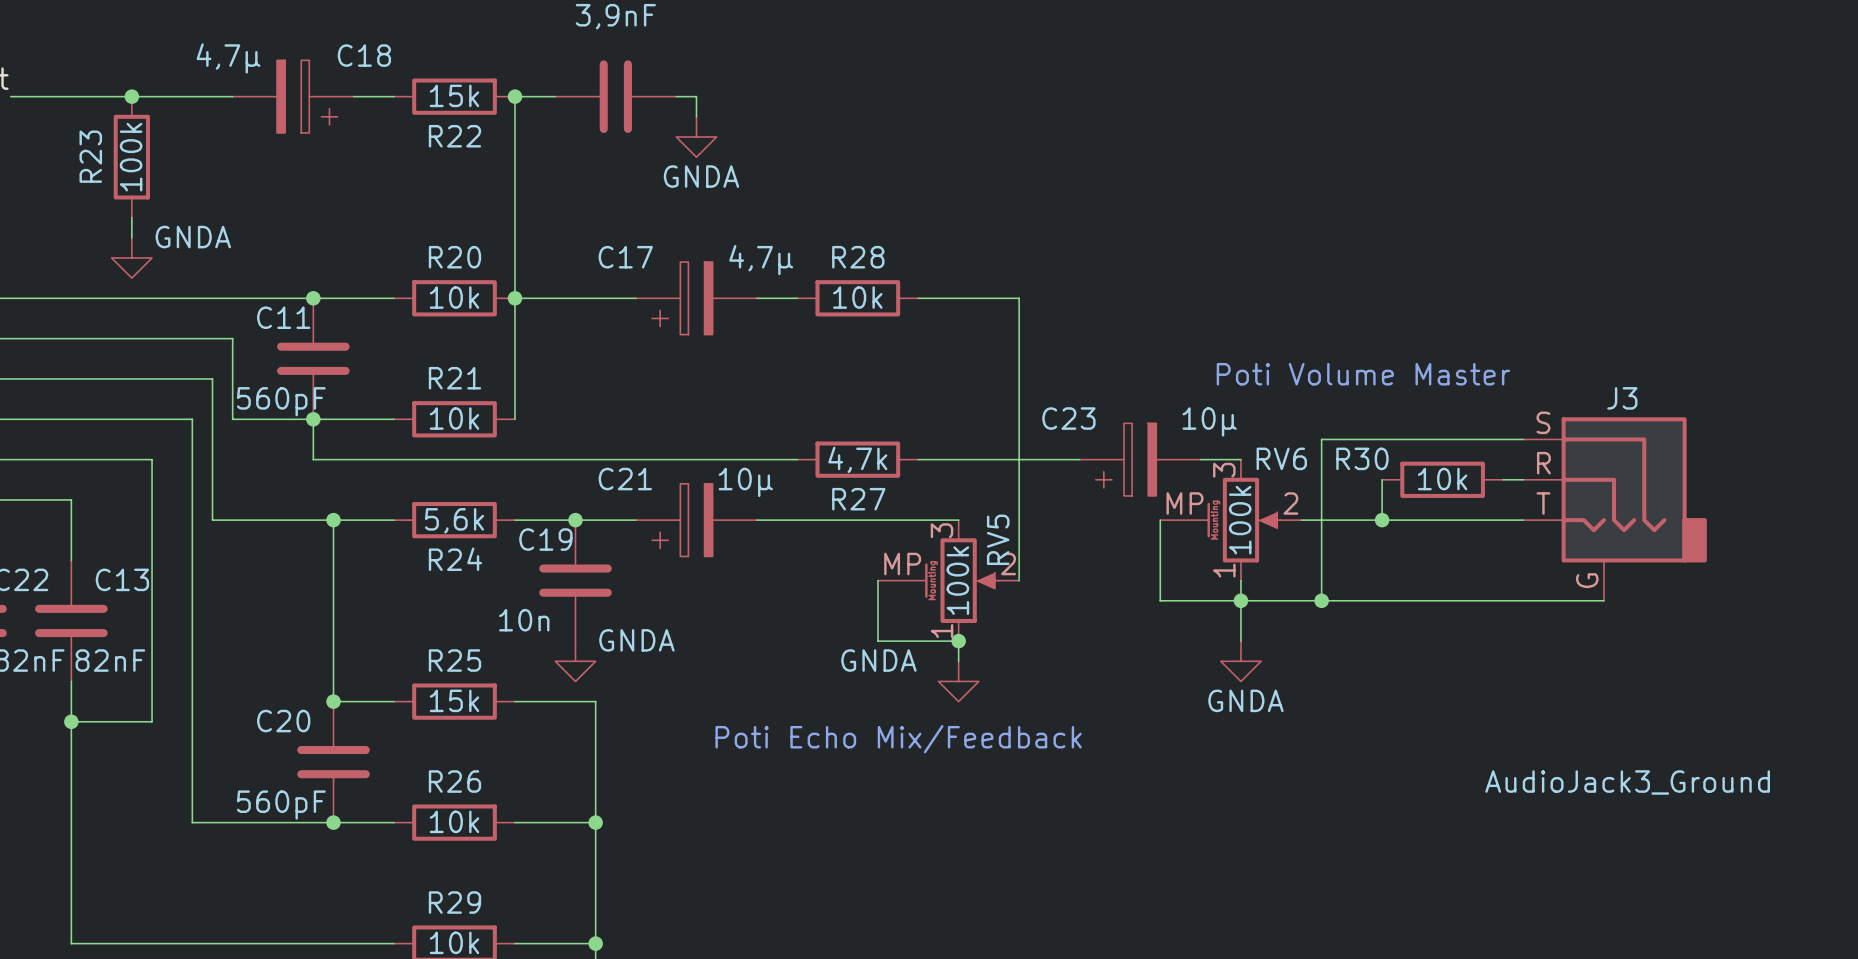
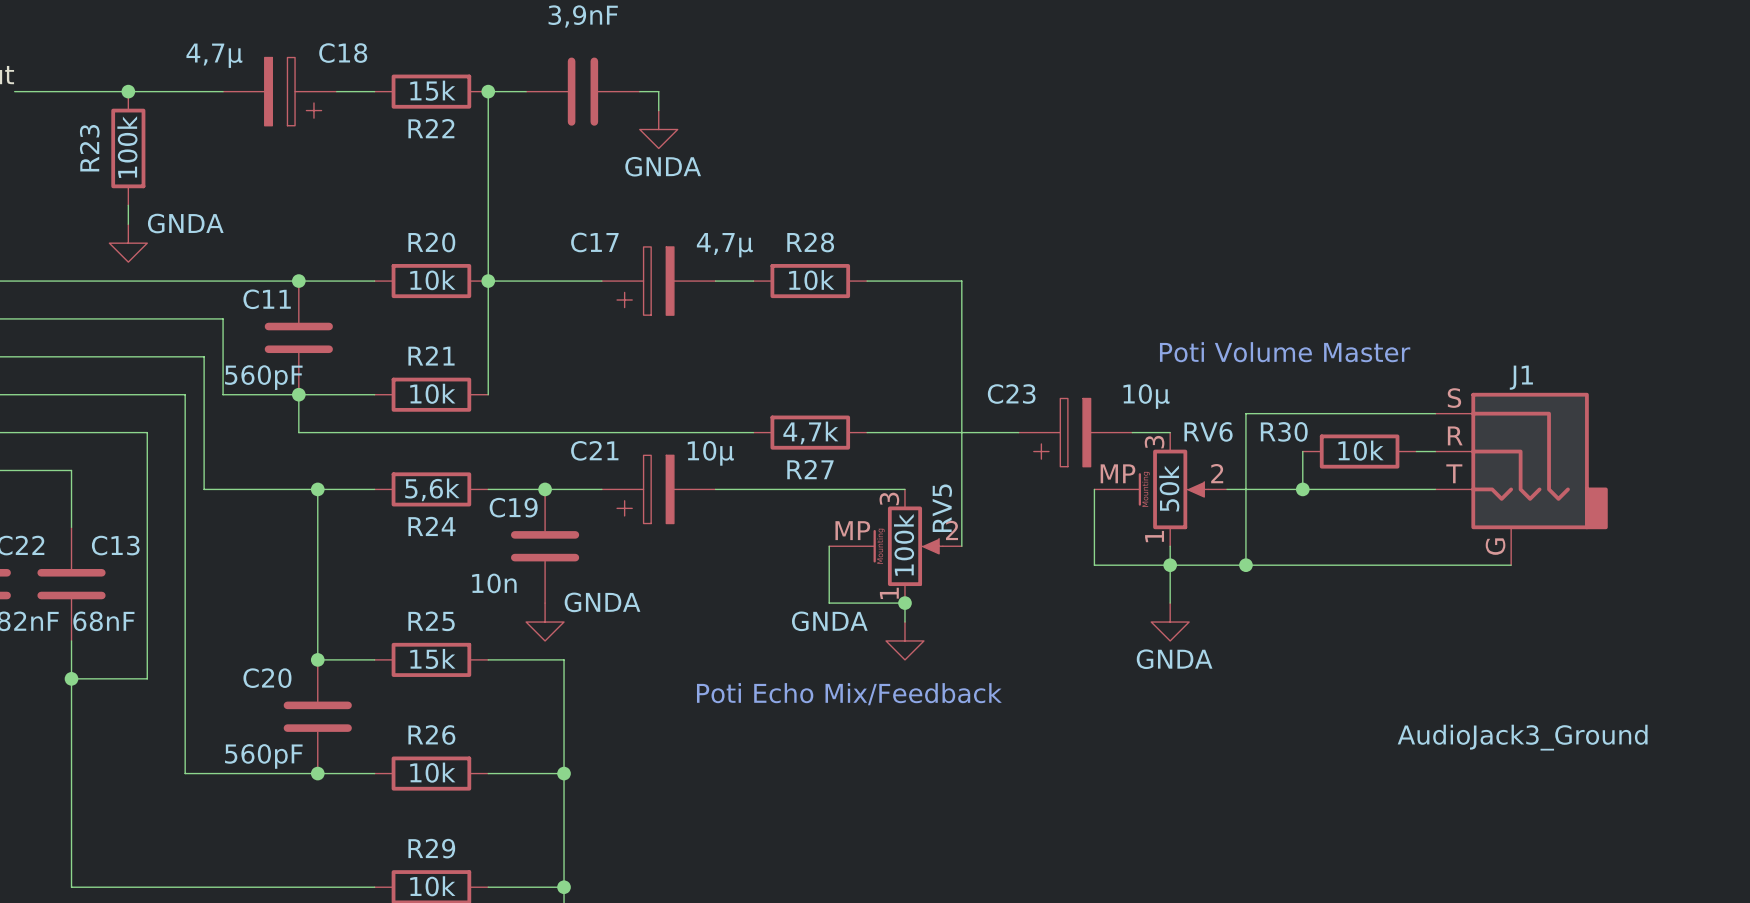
J3 name: J3 (1622, 398) -> J1 (1521, 377)
RV6 value: 100k (1240, 520) -> 50k (1169, 488)
C13 value: 82nF (110, 660) -> 68nF (103, 621)

